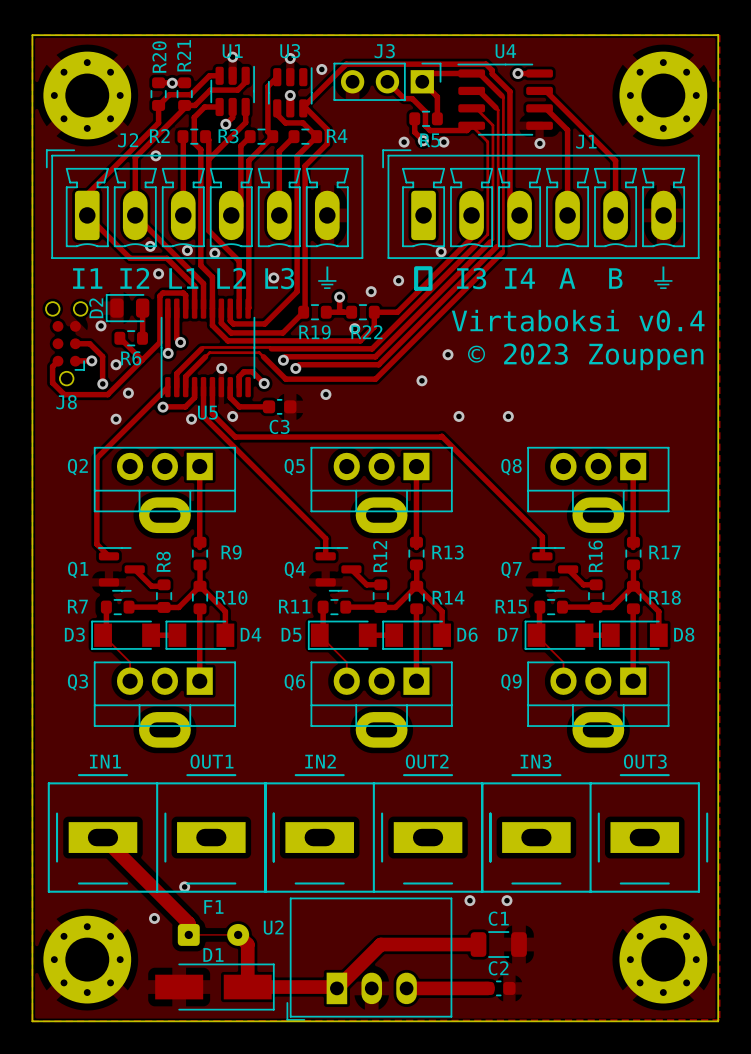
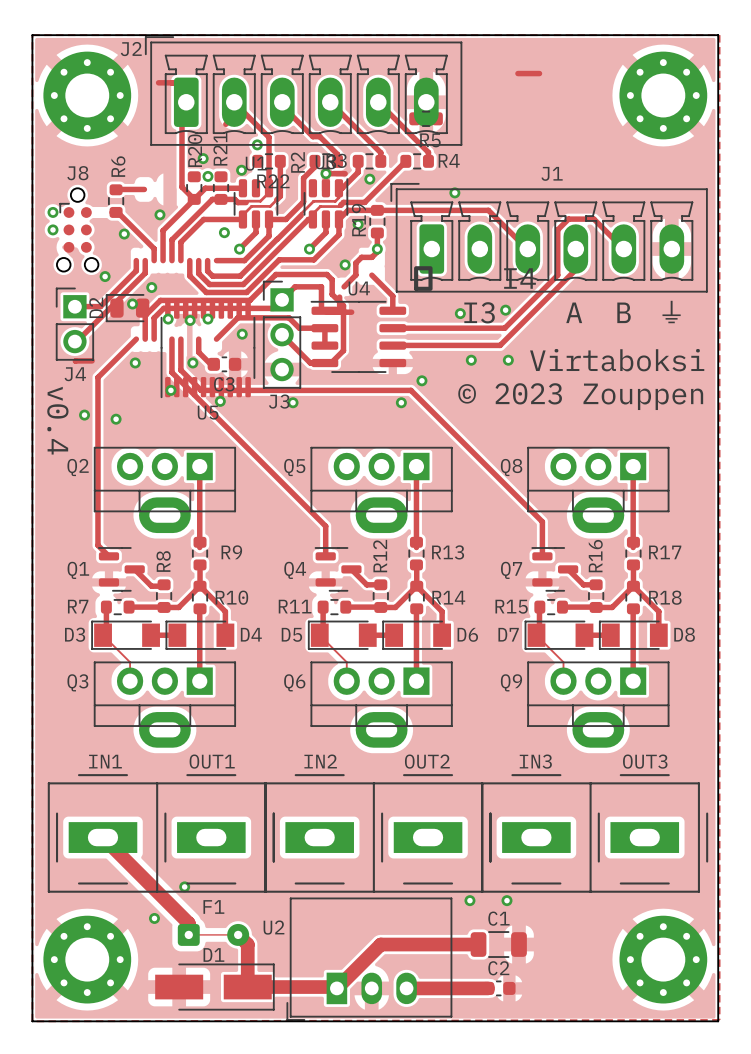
J3 name position: J3 (384, 51) -> J3 (279, 401)
via: (232, 57) -> none
via: (290, 58) -> none
via: (321, 69) -> none
via: (517, 73) -> none
track: (219, 75) (209, 75) (190, 94) (169, 94) (158, 105) (158, 123) (87, 194) (87, 215) (130, 258) (166, 258) (194, 285) (194, 308) -> none
track: (245, 75) (245, 82) (237, 90) (210, 90) (195, 105) (184, 105) -> none
track: (277, 77) (267, 86) (267, 131) (272, 136) (248, 160) (248, 308) -> none
track: (387, 81) (404, 98) (412, 98) (425, 111) (425, 125) (430, 130) (466, 130) (471, 125) (487, 141) (487, 234) (372, 348) (202, 347) (176, 373) (176, 387) -> none
J3 rotation: 0° (387, 81) -> 90° counterclockwise (282, 334)
J3 position: (387, 81) -> (282, 334)
via: (172, 83) -> none
U1 position: (232, 90) -> (255, 203)
track: (475, 90) (471, 90) (479, 90) (498, 110) (498, 245) (378, 364) (299, 364) (295, 368) -> none
track: (539, 90) (545, 90) (615, 160) (615, 215) -> none
U3 position: (290, 92) -> (325, 203)
R20 position: (158, 94) -> (194, 188)
R21 position: (184, 94) -> (221, 188)
via: (290, 95) -> none
U4 position: (505, 99) -> (358, 336)
track: none -> (186, 102) (181, 106) (181, 187) (194, 199)
track: none -> (234, 102) (269, 137) (269, 192) (260, 201) (237, 202) (234, 199) (212, 199) (171, 239) (171, 260)
track: none -> (282, 102) (282, 106) (312, 136) (319, 136) (337, 154) (337, 161)
track: none -> (330, 102) (380, 152) (380, 161)
track: none -> (378, 102) (428, 152) (428, 161)
track: (187, 105) (135, 157) (135, 215) (203, 283) (203, 308) -> none
track: (219, 106) (204, 106) (194, 117) (194, 143) (200, 149) (200, 265) (212, 277) (212, 325) (227, 340) (360, 340) (374, 326) (374, 312) (397, 312) (471, 238) (471, 215) -> none
track: (245, 106) (245, 122) (208, 159) -> none
track: (277, 108) (277, 114) (285, 122) (302, 122) (316, 136) (297, 156) (297, 291) (264, 323) (233, 323) (230, 320) (230, 308) -> none
track: (471, 108) (475, 108) (492, 125) (492, 239) (375, 356) (285, 356) (282, 360) -> none
track: (539, 108) (545, 108) (567, 130) (567, 215) -> none
track: (414, 118) (414, 132) (423, 140) -> none
track: (437, 118) (437, 96) (422, 81) (430, 73) (479, 73) (503, 97) (503, 251) (375, 379) (285, 379) (259, 352) (209, 352) (185, 376) (185, 387) -> none
via: (225, 124) -> none
R2 name rotation: 0° (159, 136) -> 90° counterclockwise (297, 162)
track: (182, 136) (183, 215) -> none
R2 position: (194, 136) -> (326, 161)
track: (205, 136) (208, 139) (208, 230) (239, 261) (239, 308) -> none
track: (250, 136) (240, 145) (240, 205) (231, 215) -> none
R3 position: (261, 136) -> (369, 161)
track: (294, 136) (279, 151) (279, 215) -> none
R4 position: (305, 136) -> (417, 161)
J2 name position: J2 (128, 140) -> J2 (131, 49)
via: (423, 140) -> none
J1 name position: J1 (586, 141) -> J1 (552, 173)
via: (404, 142) -> none
via: (443, 142) -> none
via: (539, 143) -> none
via: none -> (257, 144)
J2 footprint: [45, 149, 364, 259] -> [144, 36, 463, 146]
via: (155, 155) -> none
via: none -> (203, 158)
track: none -> (280, 161) (280, 196) (270, 206) (251, 206) (242, 215) (242, 219) (203, 219) (180, 242) (180, 260)
track: none -> (314, 161) (314, 166) (303, 178) (303, 201) (285, 219) (269, 219) (269, 236) (244, 260) (216, 260)
track: none -> (358, 161) (358, 172) (342, 188) (338, 188) (338, 197) (335, 201) (313, 201) (277, 239)
track: none -> (405, 161) (364, 202) (343, 202) (341, 204)
via: none -> (241, 170)
track: none -> (325, 173) (345, 173)
via: none -> (325, 173)
via: none -> (207, 176)
via: none -> (369, 179)
track: none -> (242, 188) (205, 188) (163, 230) (163, 260)
track: none -> (144, 189) (116, 189)
via: none -> (454, 192)
J1 position: (540, 204) -> (549, 237)
track: none -> (341, 205) (320, 206) (312, 213) (312, 219) (308, 219) (243, 284) (209, 284) (198, 273) (198, 260)
via: none -> (52, 212)
track: none -> (111, 212) (117, 212) (154, 248) (154, 260)
via: none -> (159, 214)
track: (519, 215) (509, 205) (509, 91) (492, 73) (492, 70) (485, 64) (346, 64) (303, 107) (327, 129) (327, 143) (305, 166) (305, 310) (282, 332) (231, 332) (221, 323) (221, 308) -> none
track: none -> (255, 219) (255, 232) (239, 249)
track: none -> (325, 219) (325, 232) (309, 249)
via: none -> (358, 224)
via: none -> (52, 229)
via: none -> (224, 232)
track: none -> (377, 233) (377, 251) (371, 257) (361, 257) (355, 263) (355, 275) (344, 286)
via: none -> (124, 234)
track: none -> (276, 239) (240, 276) (212, 276) (207, 271) (207, 260)
via: (150, 246) -> none
via: none -> (239, 249)
via: none -> (309, 249)
via: none -> (377, 249)
track: none -> (527, 249) (488, 210) (348, 210) (338, 219) (338, 234) (313, 259) (279, 259) (246, 292) (206, 292) (189, 275) (189, 260)
track: none -> (575, 249) (575, 269) (500, 345) (392, 345)
track: none -> (623, 249) (593, 219) (568, 219) (557, 229) (557, 275) (504, 328) (392, 328)
via: (187, 250) -> none
via: (441, 251) -> none
via: (214, 253) -> none
track: none -> (136, 260) (136, 270) (100, 306) (74, 306)
track: none -> (145, 260) (145, 273) (74, 341)
via: none -> (345, 264)
via position: (158, 273) -> (151, 287)
track: none -> (371, 275) (392, 296) (392, 310)
via: none -> (105, 276)
via: (273, 277) -> none
text: ⏚ (327, 277) -> none
text position: ⏚ (663, 277) -> ⏚ (671, 312)
text: I1 (87, 278) -> none
text: I2 (134, 278) -> none
text: L1 (183, 278) -> none
text: L2 (231, 278) -> none
text: L3 (279, 278) -> none
text position: I3 (471, 278) -> I3 (479, 312)
text position: A (567, 278) -> A (574, 312)
text position: B (615, 278) -> B (624, 312)
via: (398, 280) -> none
via: (371, 291) -> none
via: (339, 297) -> none
via: none -> (132, 303)
track: none -> (321, 307) (321, 286) (295, 286) (273, 308) (163, 308) (154, 318) (154, 339)
track: (142, 308) (142, 338) -> none
track: (167, 308) (166, 351) -> none
track: (176, 308) (176, 338) (180, 342) -> none
track: (185, 308) (185, 295) (183, 293) (162, 293) (159, 296) (159, 342) (107, 394) (64, 394) (52, 382) (52, 366) (57, 361) -> none
via: none -> (505, 310)
R19 rotation: 0° (314, 312) -> 90° clockwise (377, 221)
R19 position: (314, 312) -> (377, 221)
R22 position: (362, 312) -> (269, 161)
via: none -> (460, 313)
via: none -> (168, 319)
via: none -> (207, 319)
via: none -> (190, 320)
text: Virtaboksi v0.4 (578, 320) -> Virtaboksi (617, 360)
J4: none -> (74, 324)
via: (100, 325) -> none
via: (354, 328) -> none
via: none -> (242, 334)
track: none -> (282, 334) (310, 363) (331, 363) (343, 350) (343, 305) (332, 294) (332, 279) (326, 274) (275, 274) (249, 300) (160, 300) (145, 315) (145, 339)
track: (119, 338) (142, 360) -> none
R6 rotation: 0° (131, 338) -> 90° clockwise (116, 201)
R6 position: (131, 338) -> (116, 201)
track: none -> (198, 339) (198, 352) (210, 364) (213, 364)
track: none -> (216, 339) (237, 317) (289, 317) (299, 328) (324, 328) (324, 345)
via: (180, 342) -> none
J8 rotation: 0° (66, 343) -> 180° (77, 229)
J8 position: (66, 343) -> (77, 229)
track: (75, 343) (89, 343) (102, 356) (102, 383) -> none
via: (168, 353) -> none
via: (448, 354) -> none
text position: © 2023 Zouppen (585, 356) -> © 2023 Zouppen (580, 396)
R6 name position: R6 (131, 358) -> R6 (118, 166)
via: (91, 360) -> none
via: (283, 360) -> none
via: none -> (471, 360)
via: none -> (508, 360)
via: none -> (135, 362)
via: none -> (192, 362)
via: (116, 364) -> none
via: (221, 368) -> none
via: (295, 368) -> none
via: (102, 383) -> none
track: (264, 383) (252, 371) (244, 371) (239, 376) (239, 387) -> none
via: (264, 383) -> none
track: (167, 387) (96, 458) (97, 545) -> (136, 339) (97, 377) (97, 545)
track: (194, 387) (194, 397) (185, 406) (162, 407) -> none
track: (203, 387) (203, 416) (325, 538) -> (171, 339) (171, 372) (325, 526) (325, 538)
track: (212, 387) (212, 414) (235, 437) (441, 436) (542, 536) -> (180, 339) (180, 370) (201, 390) (410, 390) (542, 521) (542, 536)
track: (230, 387) (230, 397) (239, 406) (269, 406) -> none
via: none -> (170, 390)
via: (128, 393) -> none
via: (325, 394) -> none
via: none -> (220, 401)
via: none -> (293, 402)
via: none -> (401, 402)
C3 position: (279, 406) -> (224, 364)
via: (162, 407) -> none
via: none -> (84, 415)
via: (232, 416) -> none
via: (458, 416) -> none
via: (508, 416) -> none
text: none -> v0.4 (57, 420)
via: (191, 419) -> none

